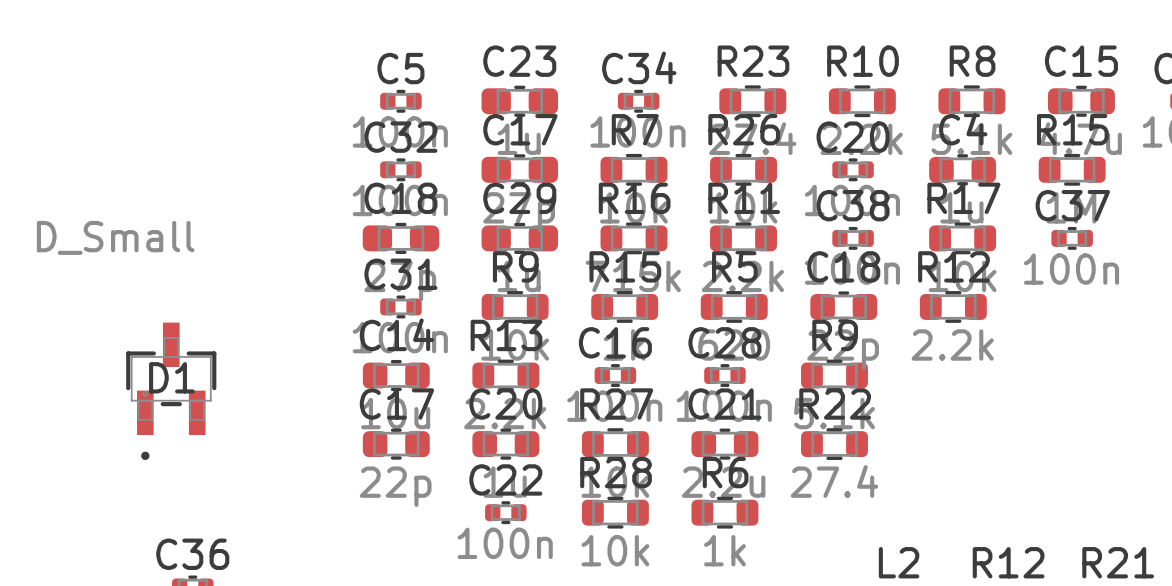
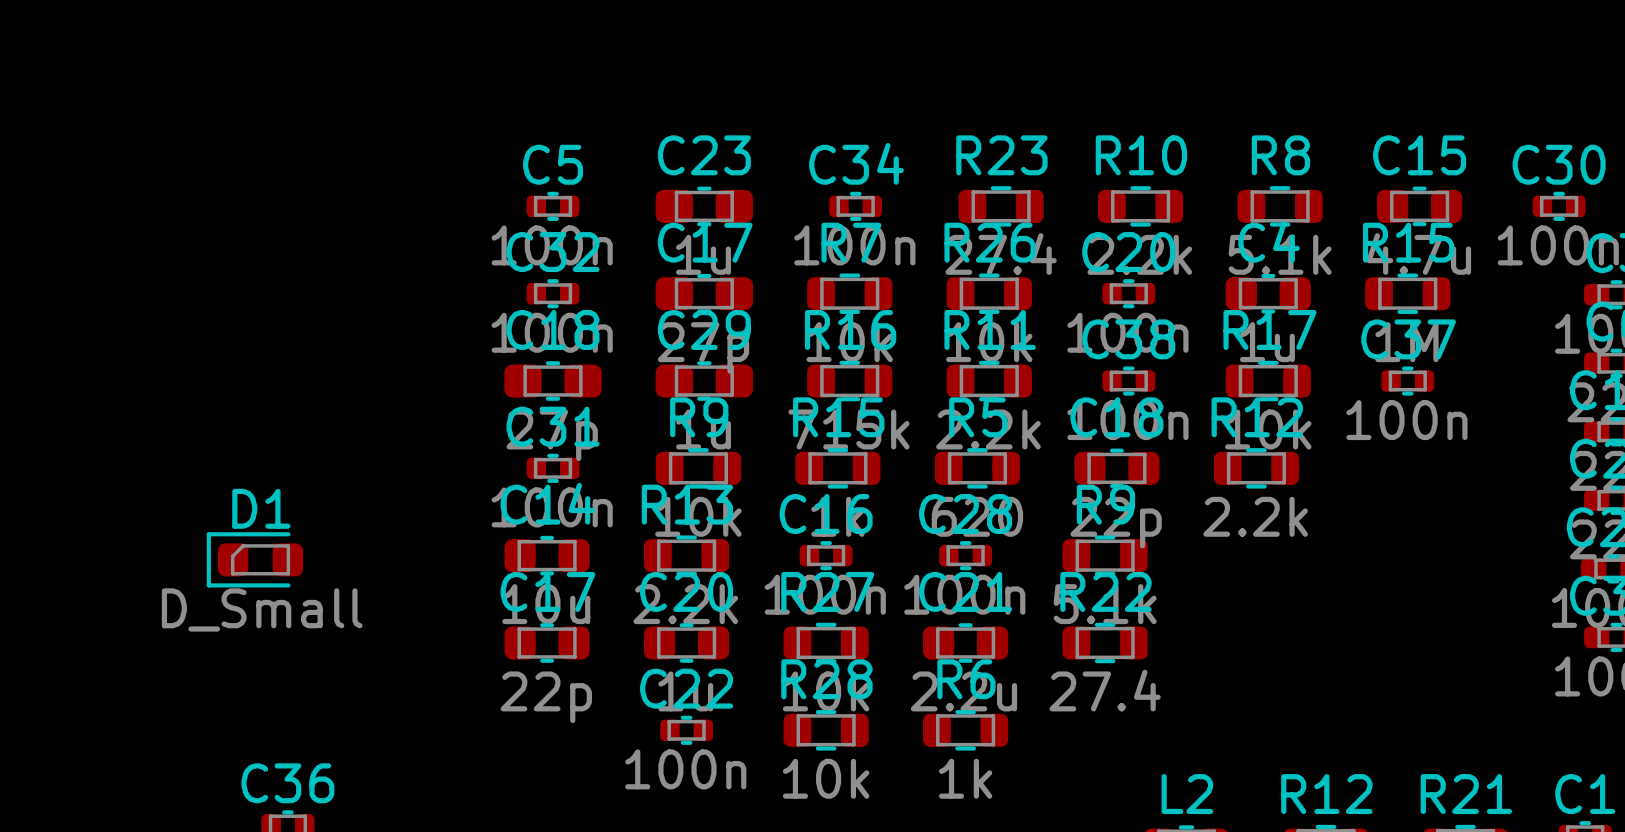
D1 value position: D_Small (115, 237) -> D_Small (262, 609)
D1 footprint: [126, 322, 217, 461] -> [206, 532, 304, 588]

